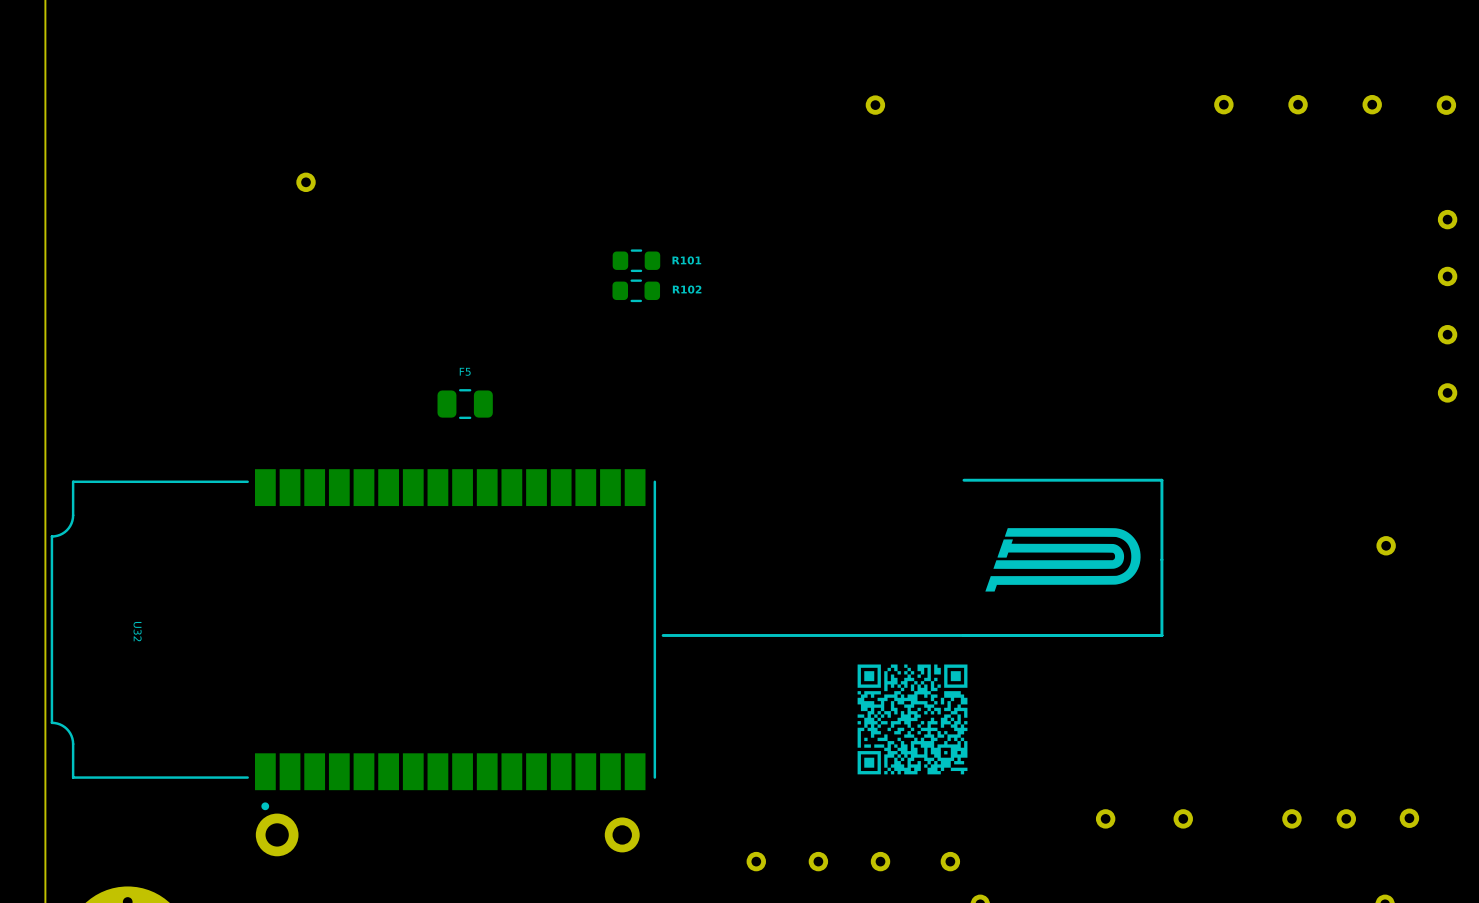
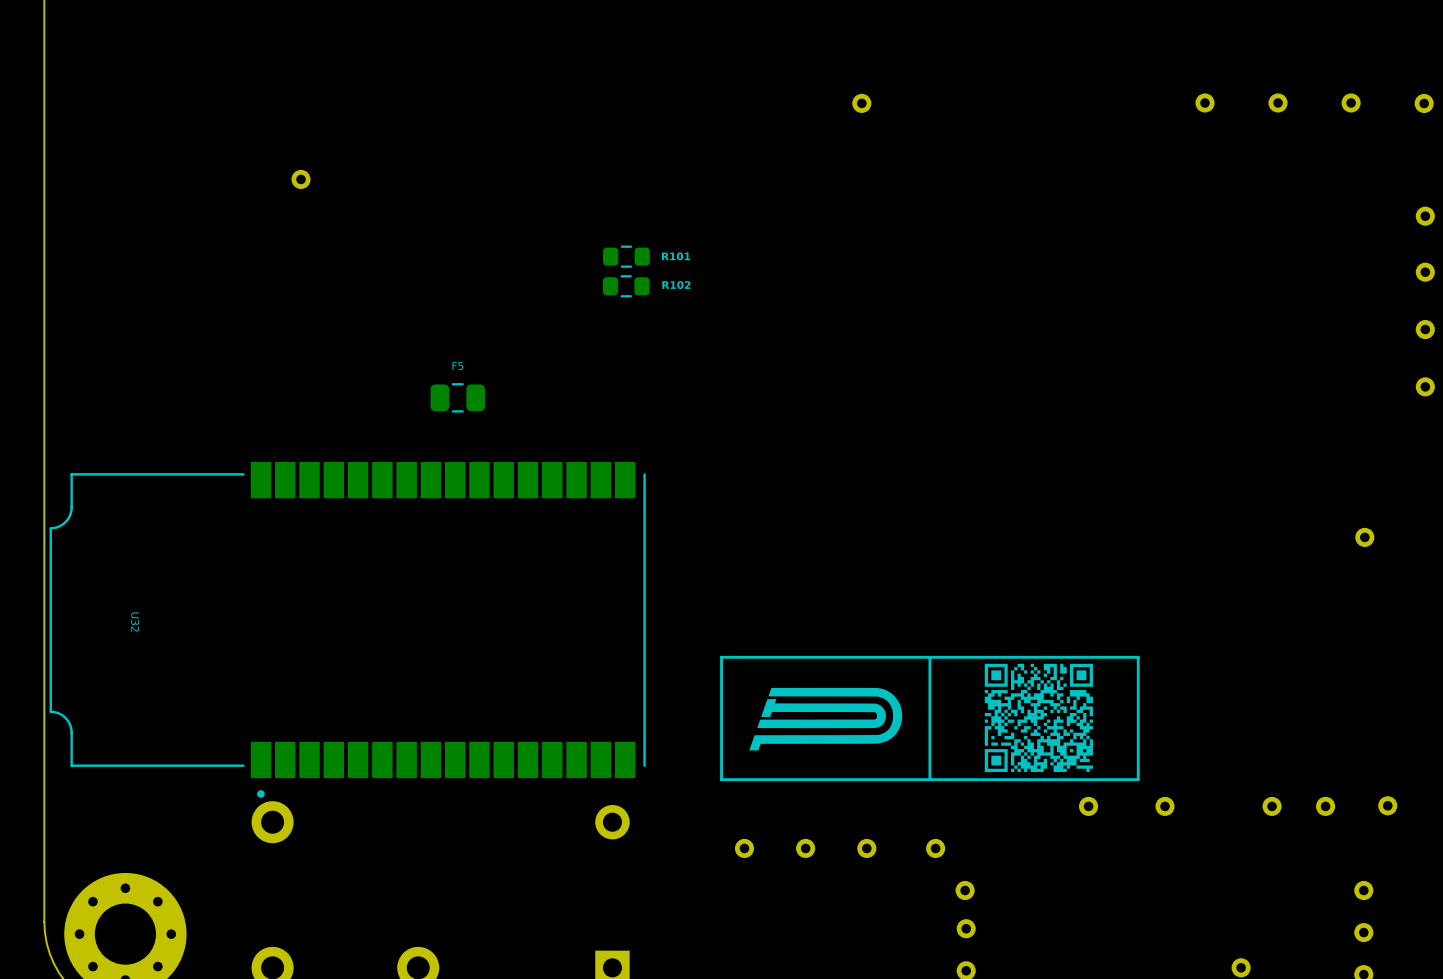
line: (963, 480) (1161, 480) (1161, 635) (663, 635) -> none
drawing position: (1062, 559) -> (825, 719)
line: none -> (929, 657) (929, 779)
line: none -> (1138, 657) (721, 657) (721, 779) (1138, 779) (1138, 657)
drawing position: (912, 719) -> (1038, 717)

